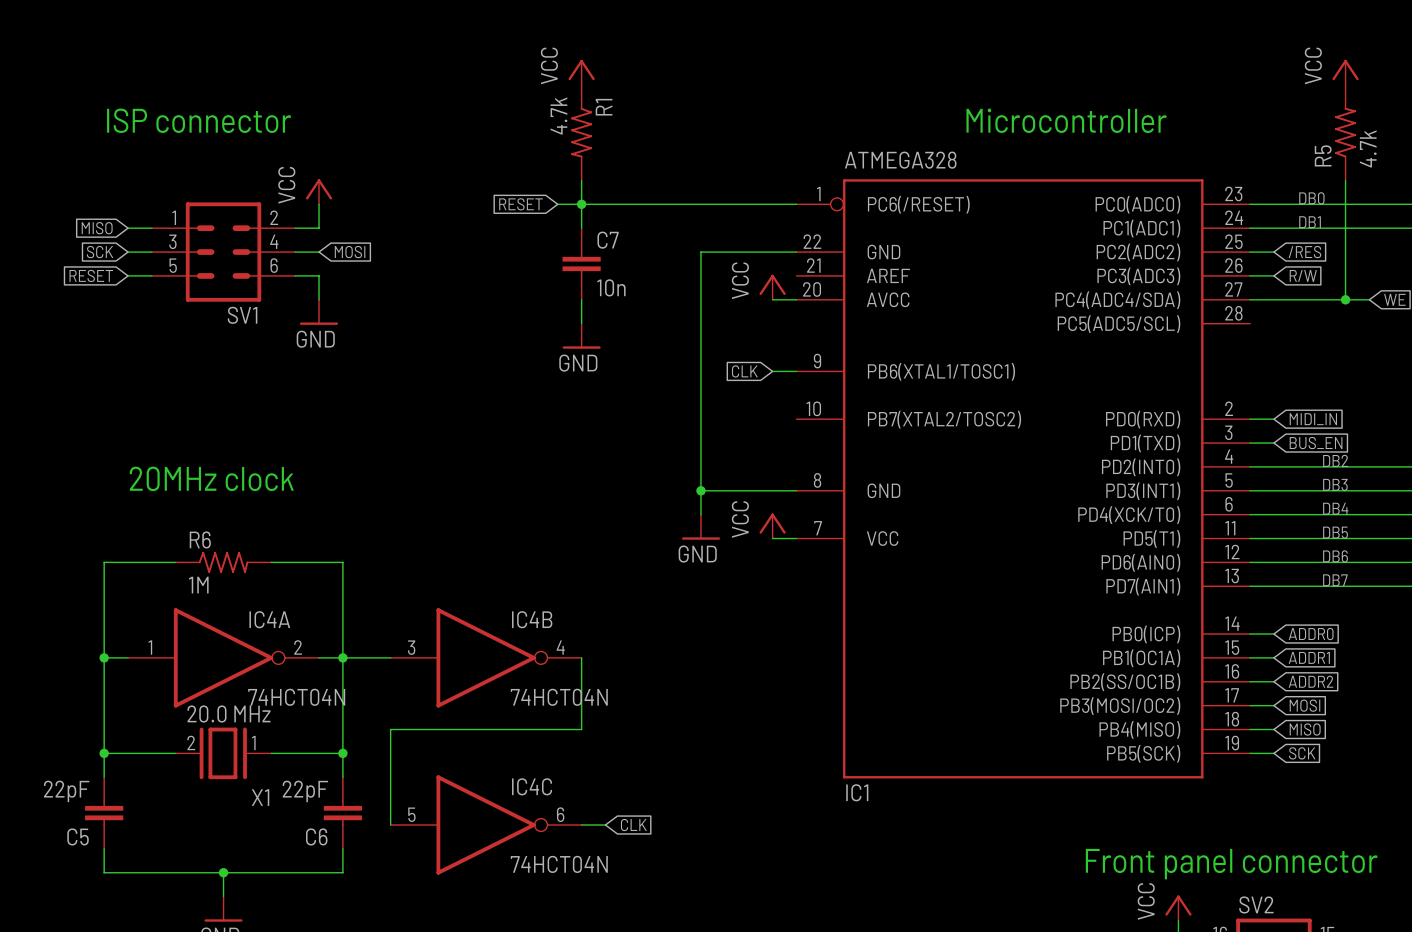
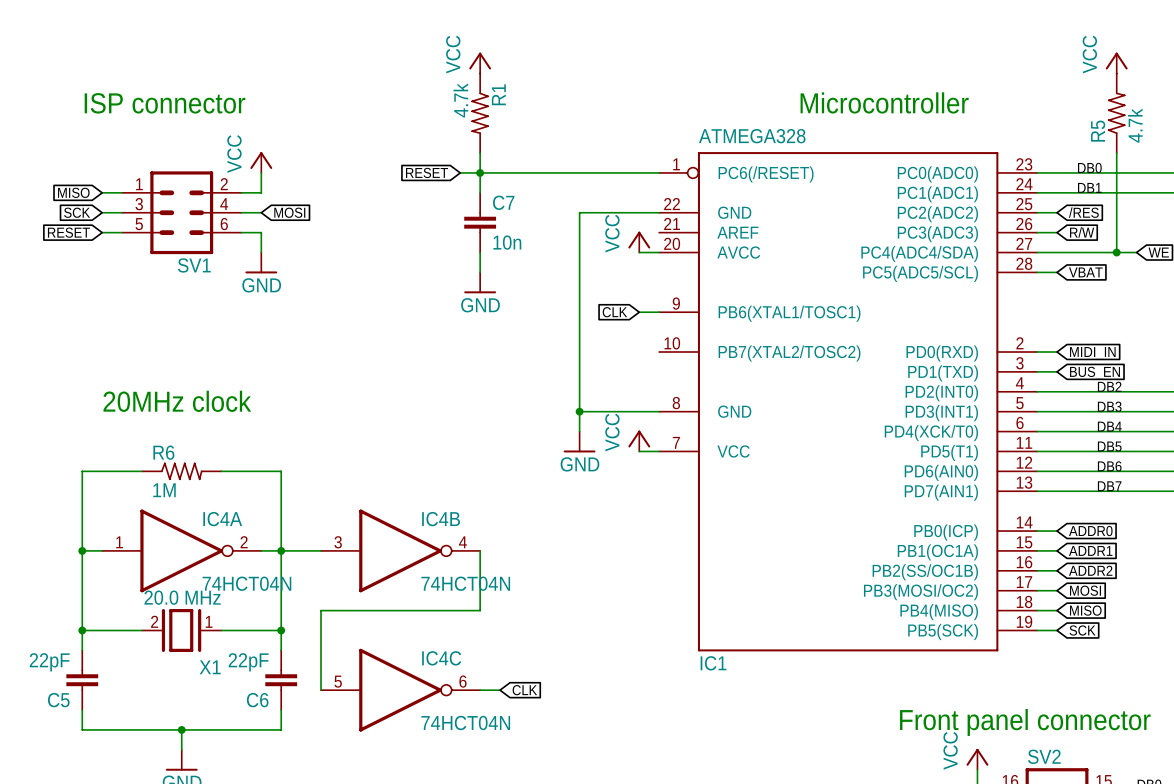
wire: none -> (1037, 272) (1057, 272)
global label: none -> VBAT (1085, 272)

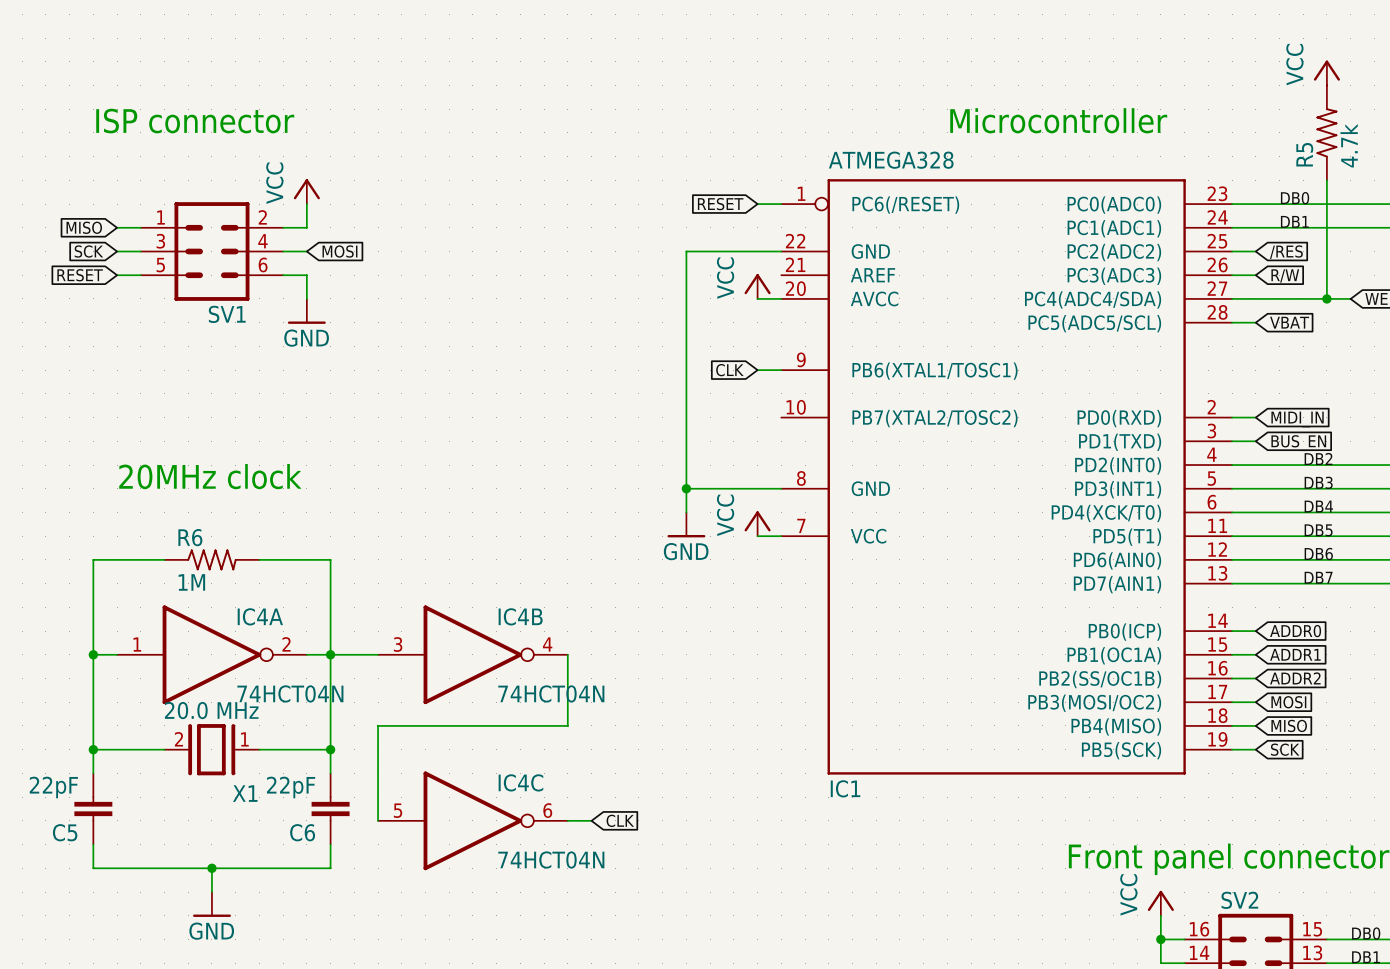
power symbol: VCC (480, 63) -> none
R1: 4.7k (480, 113) -> none
wire: (480, 153) (480, 192) -> none
global label position: RESET (427, 172) -> RESET (720, 204)
wire: (460, 172) (639, 172) -> none
junction: (480, 172) -> none
C7: 10n (480, 222) -> none
wire: (480, 252) (480, 272) -> none
power symbol: GND (480, 282) -> none

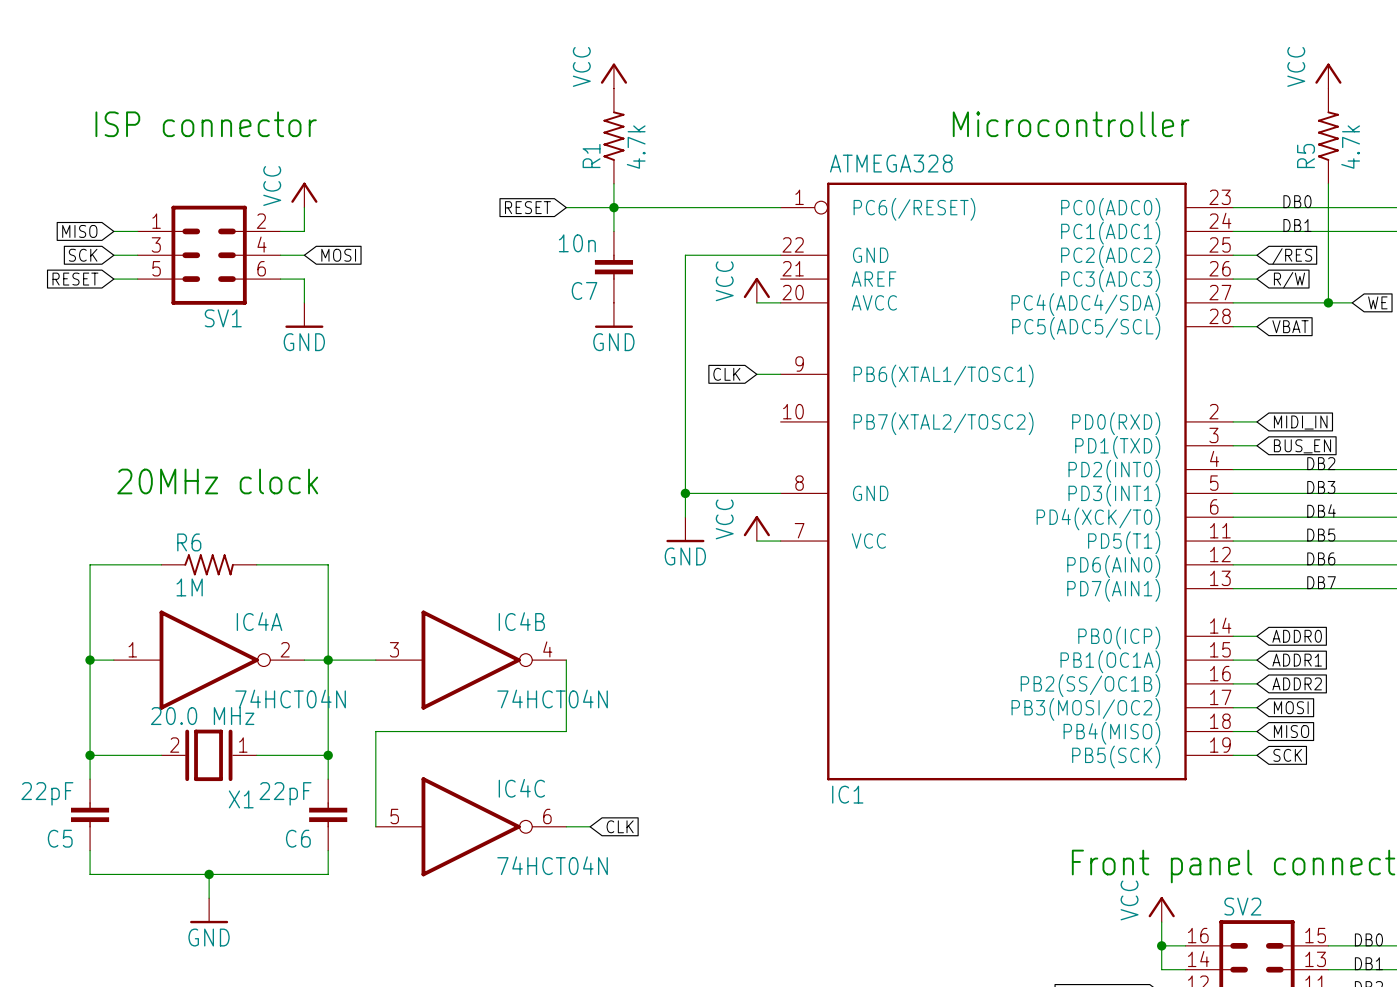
power symbol: none -> VCC (613, 76)
R1: none -> 4.7k (613, 136)
wire: none -> (613, 183) (613, 231)
wire: none -> (566, 207) (756, 207)
junction: none -> (613, 207)
global label position: RESET (720, 204) -> RESET (527, 207)
C7: none -> 10n (613, 267)
power symbol: none -> GND (613, 315)

